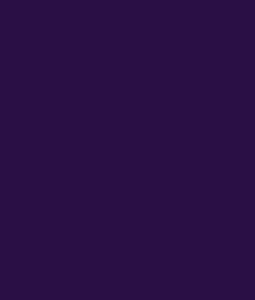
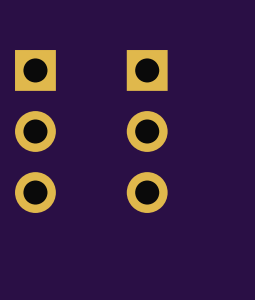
part: none -> (35, 131)
part: none -> (147, 131)

